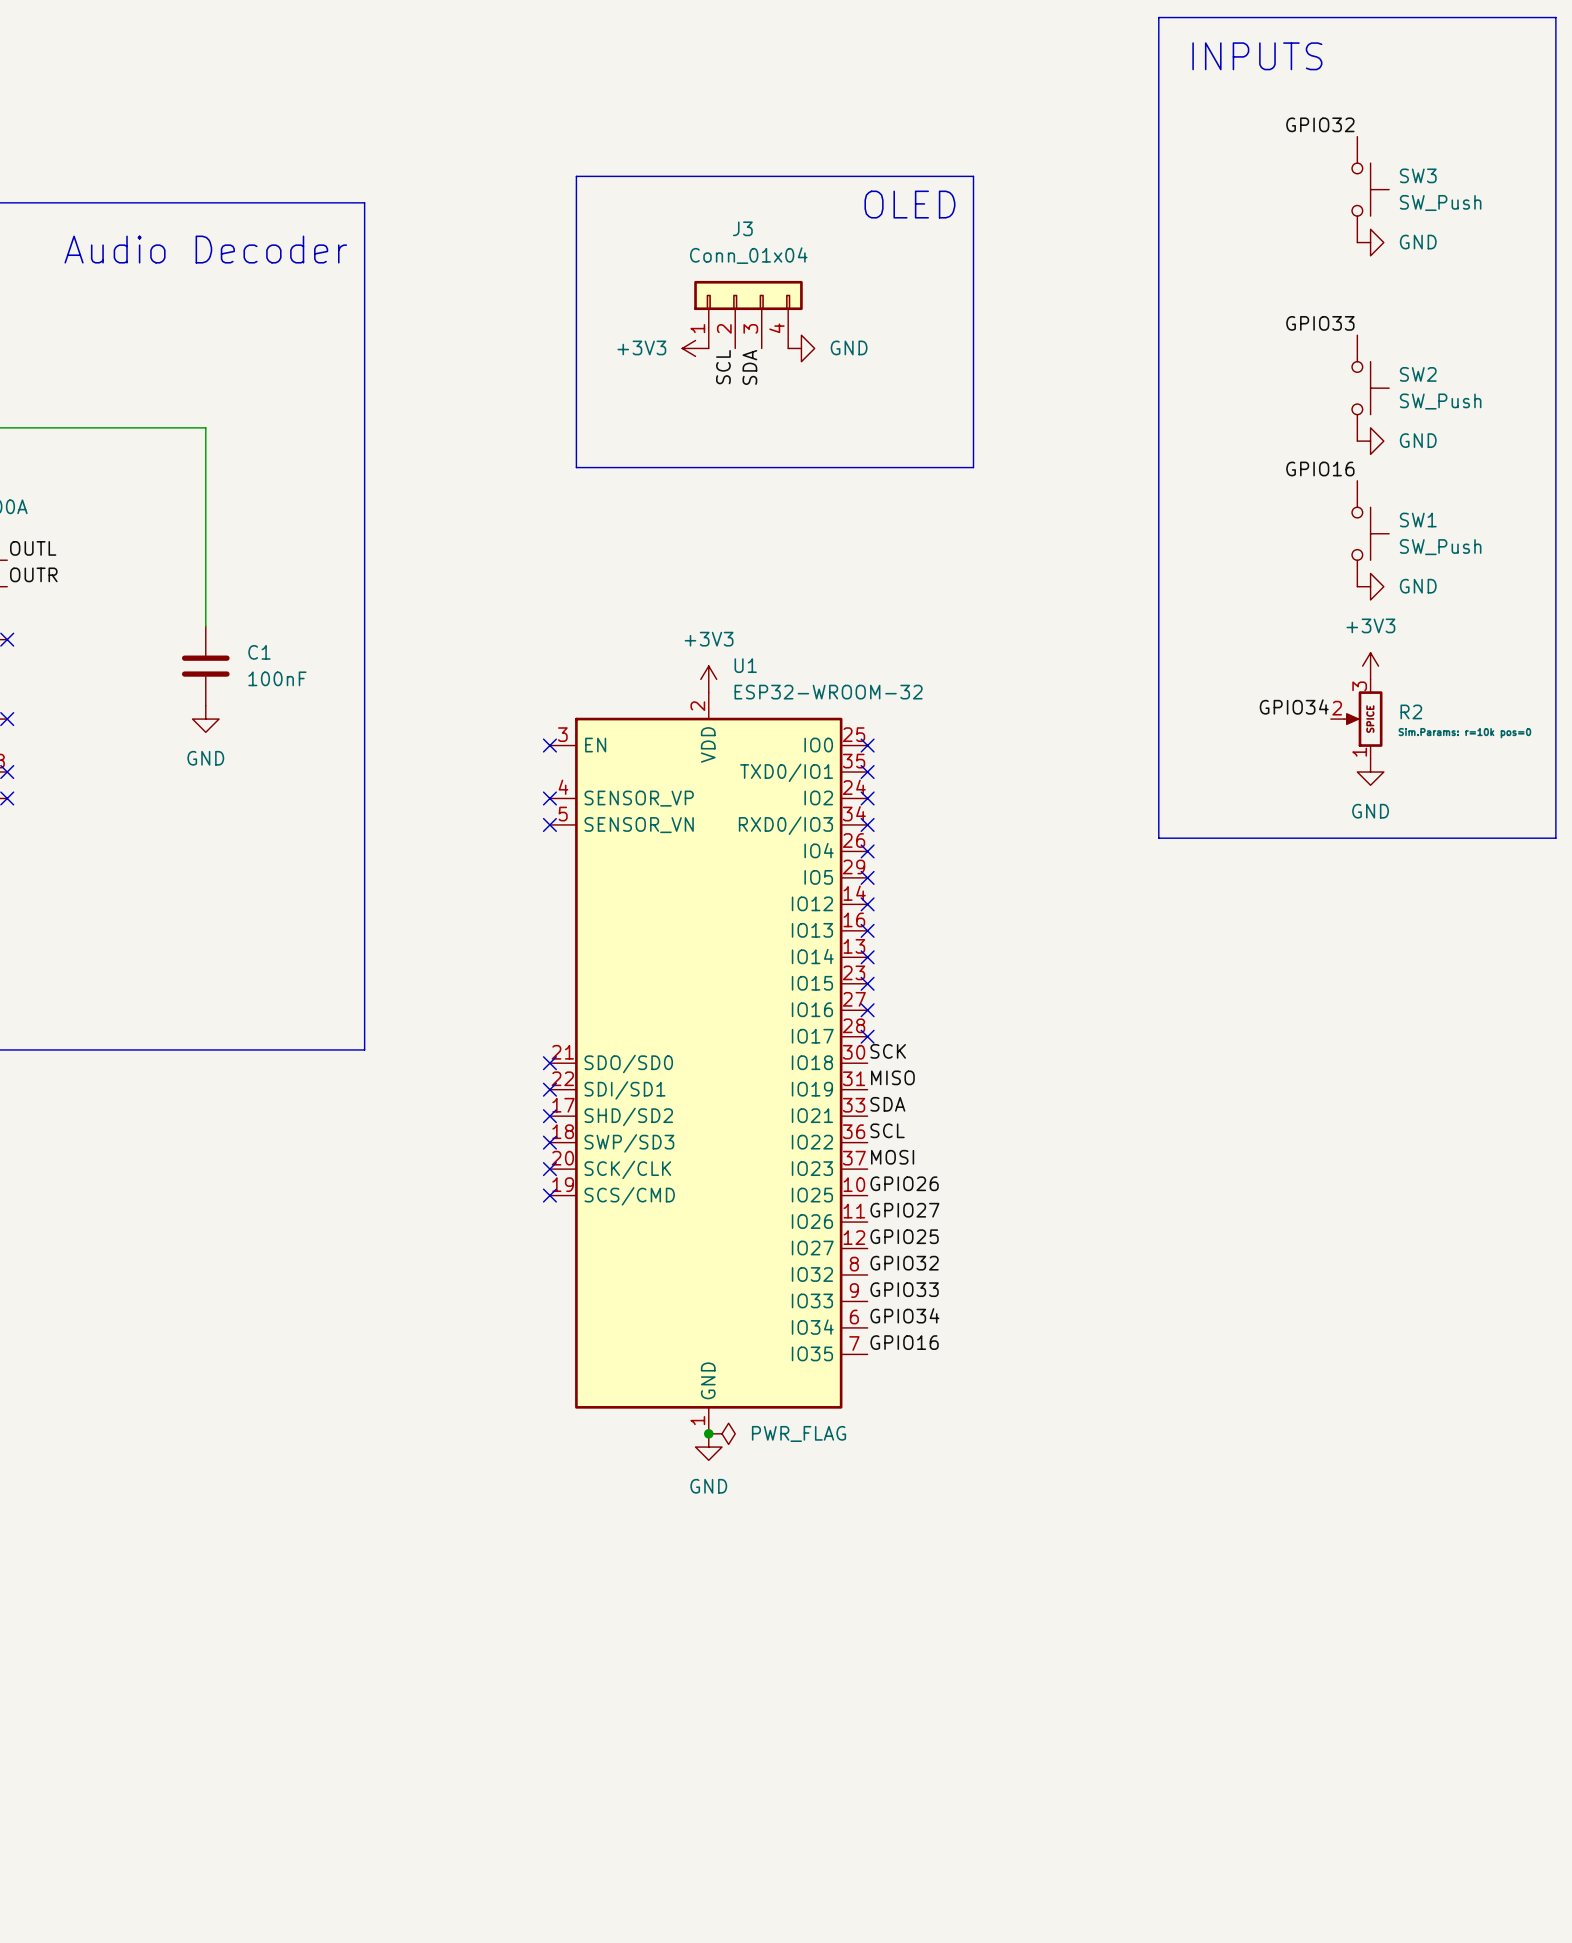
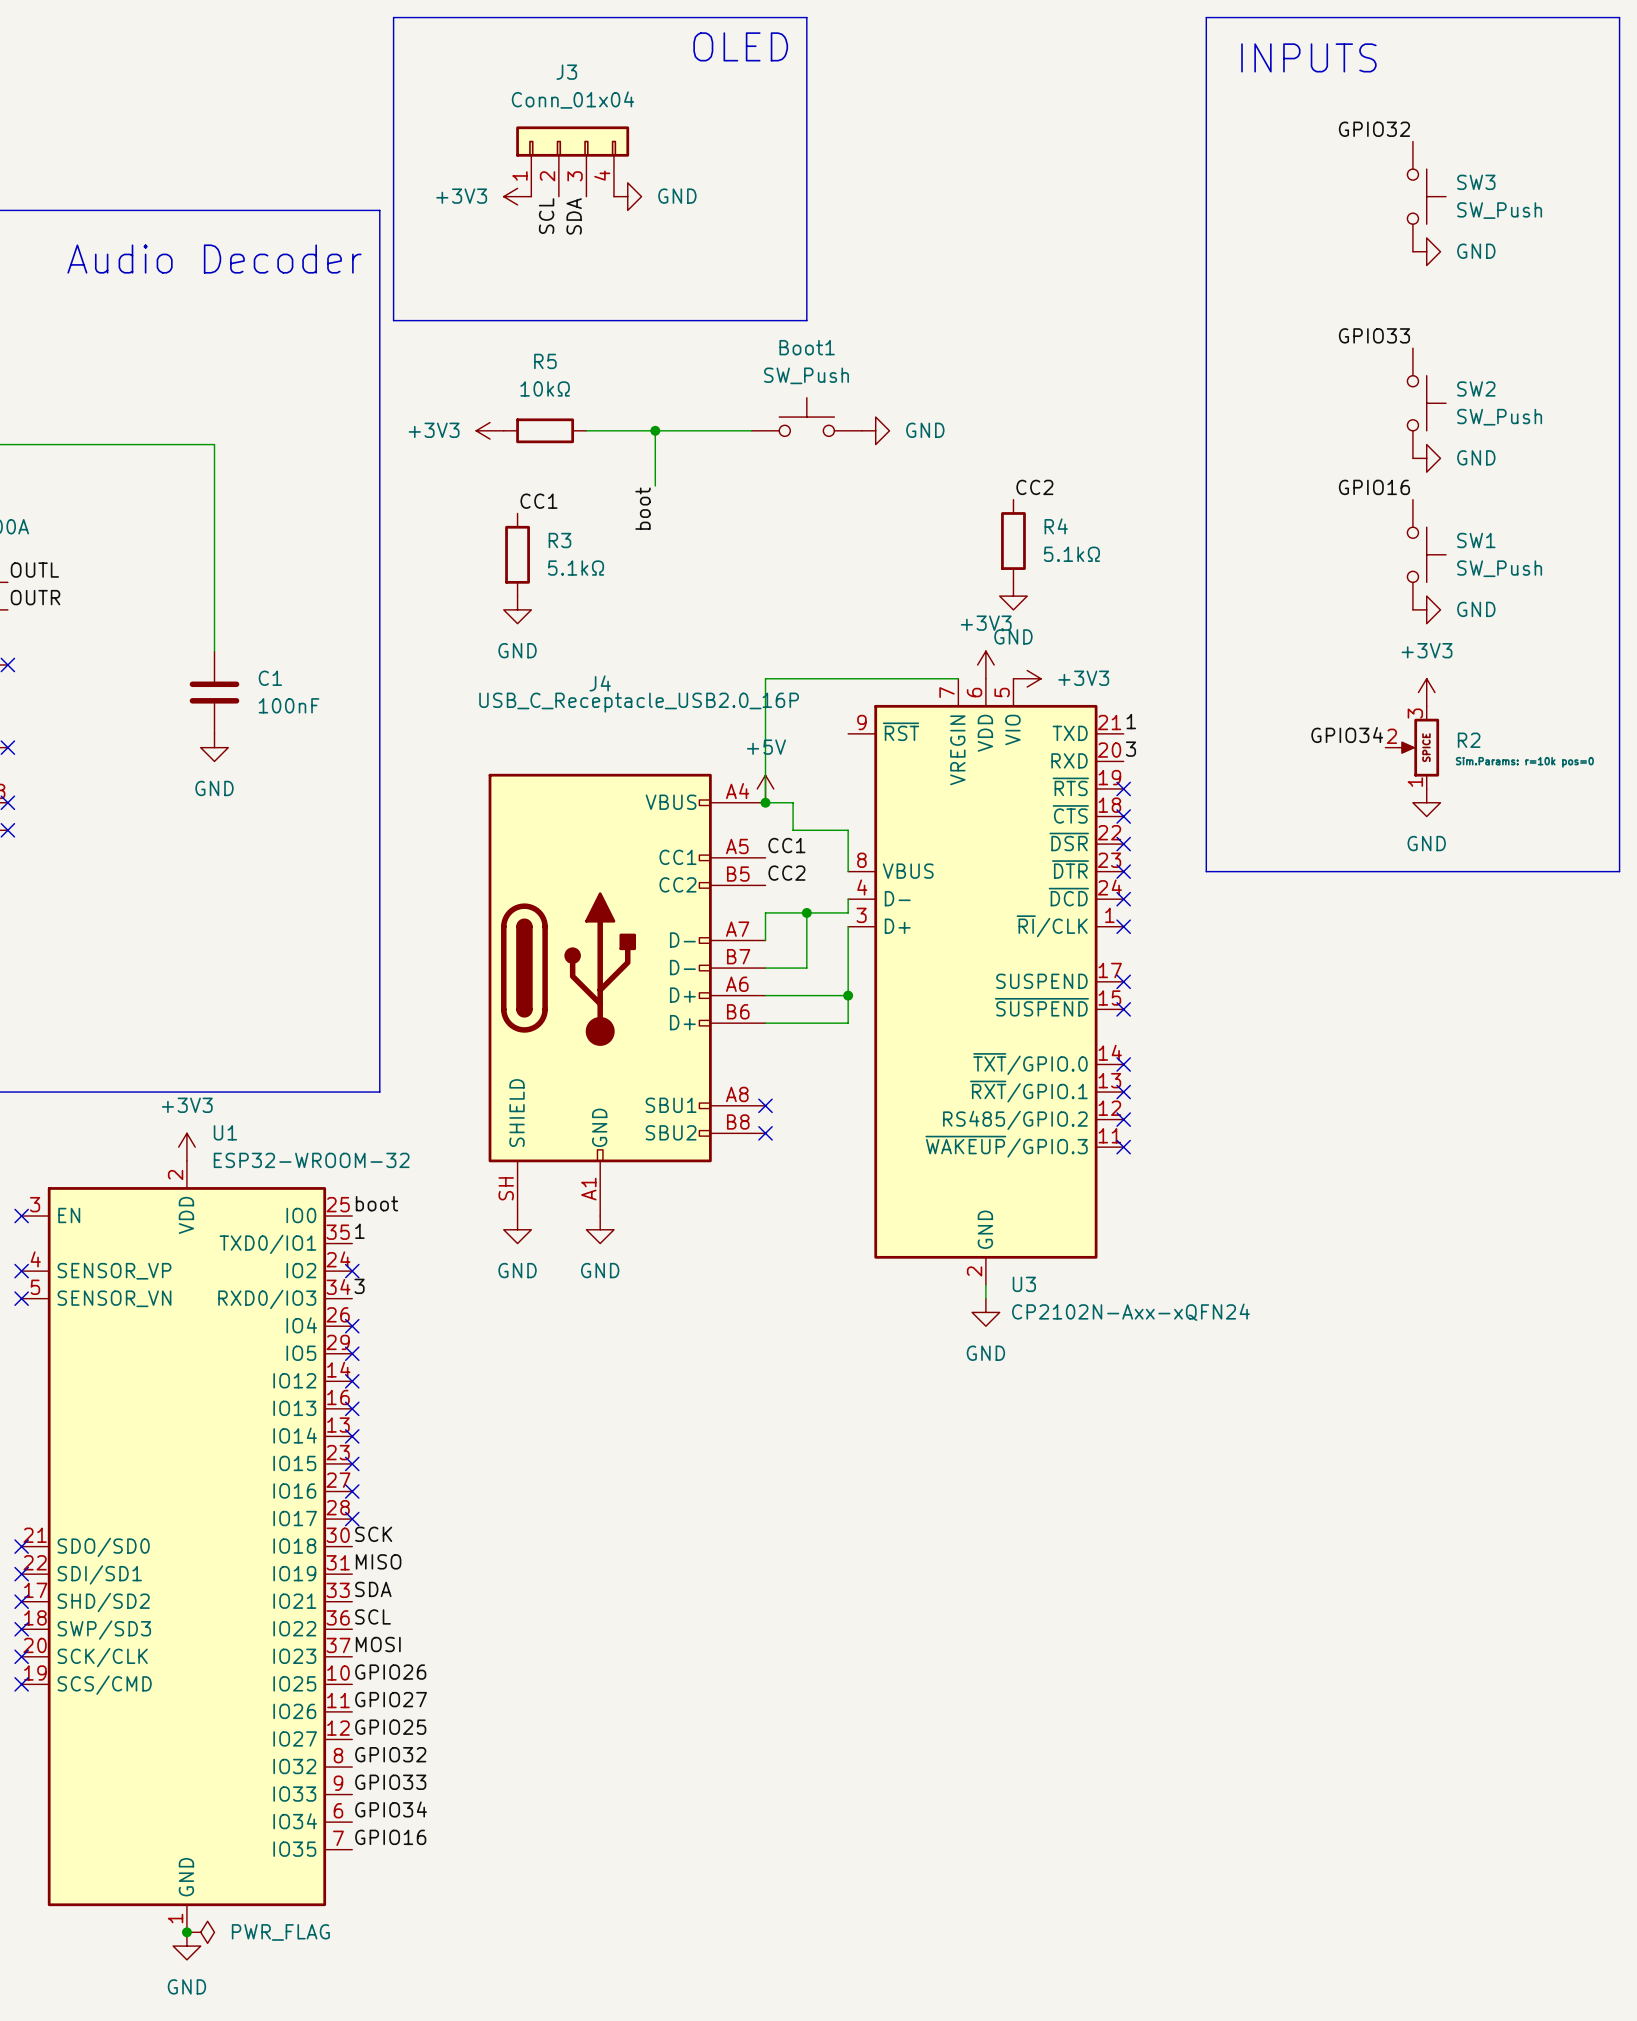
line: (576, 176) (973, 176) (973, 467) (576, 467) (576, 176) -> (393, 17) (806, 17) (806, 320) (393, 320) (393, 17)
power symbol: none -> +3V3 (517, 196)
power symbol: none -> GND (627, 196)
text position: OLED (909, 204) -> OLED (740, 46)
J3 position: (748, 314) -> (572, 161)
power symbol: +3V3 (695, 348) -> none
power symbol position: GND (801, 348) -> GND (875, 430)
label position: SCL (723, 367) -> SCL (546, 216)
label position: SDA (749, 367) -> SDA (574, 216)
Boot1: none -> SW_Push (806, 417)
power symbol: none -> +3V3 (490, 430)
R5: none -> 10kΩ (545, 430)
wire: none -> (586, 430) (751, 430)
wire: none -> (655, 430) (655, 485)
junction: none -> (655, 430)
label: none -> CC2 (1034, 487)
label: none -> CC1 (538, 501)
label: none -> boot (643, 508)
R4: none -> 5.1kΩ (1013, 541)
R3: none -> 5.1kΩ (517, 554)
power symbol: none -> GND (1013, 596)
power symbol: none -> GND (517, 609)
power symbol: none -> +3V3 (985, 665)
wire: none -> (958, 678) (765, 678) (765, 802) (793, 802) (793, 830) (848, 830) (848, 871)
power symbol: none -> +3V3 (1027, 678)
power symbol: +3V3 (708, 679) -> none
label: none -> 1 (1131, 721)
label: none -> 3 (1130, 749)
no-connect mark: (549, 745) -> none
no-connect mark: (867, 745) -> none
power symbol: none -> +5V (765, 788)
no-connect mark: none -> (1123, 788)
junction: none -> (765, 802)
no-connect mark: (867, 772) -> none
no-connect mark: none -> (1123, 816)
no-connect mark: (549, 798) -> none
no-connect mark: (867, 798) -> none
no-connect mark: none -> (1123, 844)
label: none -> CC1 (786, 845)
no-connect mark: (549, 824) -> none
no-connect mark: (867, 824) -> none
no-connect mark: none -> (1123, 871)
label: none -> CC2 (786, 873)
no-connect mark: (867, 851) -> none
no-connect mark: none -> (1123, 899)
junction: none -> (806, 912)
no-connect mark: (867, 877) -> none
no-connect mark: none -> (1123, 926)
no-connect mark: (867, 904) -> none
no-connect mark: (867, 930) -> none
U3: none -> CP2102N-Axx-xQFN24 (985, 981)
no-connect mark: none -> (1123, 981)
J4: none -> USB_C_Receptacle_USB2.0_16P (627, 994)
junction: none -> (848, 995)
no-connect mark: (867, 957) -> none
no-connect mark: none -> (1123, 1009)
no-connect mark: (867, 983) -> none
no-connect mark: (867, 1010) -> none
no-connect mark: none -> (1123, 1064)
no-connect mark: (867, 1036) -> none
no-connect mark: none -> (1123, 1092)
label: SCK (888, 1051) -> none
no-connect mark: (549, 1063) -> none
U1 position: (708, 1063) -> (186, 1546)
no-connect mark: none -> (765, 1105)
no-connect mark: none -> (1123, 1119)
label: MISO (892, 1077) -> none
no-connect mark: (549, 1089) -> none
no-connect mark: none -> (765, 1133)
power symbol: none -> +3V3 (186, 1147)
no-connect mark: none -> (1123, 1147)
label: SDA (887, 1104) -> none
no-connect mark: (549, 1116) -> none
label: SCL (887, 1130) -> none
no-connect mark: (549, 1142) -> none
label: none -> boot (376, 1203)
label: MOSI (892, 1157) -> none
no-connect mark: none -> (21, 1216)
no-connect mark: (549, 1169) -> none
power symbol: none -> GND (517, 1229)
power symbol: none -> GND (600, 1229)
label: none -> 1 (359, 1231)
label: GPIO26 (904, 1183) -> none
no-connect mark: (549, 1195) -> none
label: GPIO27 (904, 1210) -> none
no-connect mark: none -> (21, 1271)
no-connect mark: none -> (352, 1271)
wire: none -> (985, 1284) (985, 1298)
label: none -> 3 (359, 1286)
label: GPIO25 (904, 1236) -> none
no-connect mark: none -> (21, 1298)
power symbol: none -> GND (985, 1312)
label: GPIO32 (904, 1263) -> none
no-connect mark: none -> (352, 1326)
label: GPIO33 (904, 1289) -> none
no-connect mark: none -> (352, 1353)
label: GPIO34 (904, 1315) -> none
no-connect mark: none -> (352, 1381)
label: GPIO16 (904, 1342) -> none
no-connect mark: none -> (352, 1408)
no-connect mark: none -> (352, 1436)
no-connect mark: none -> (352, 1463)
no-connect mark: none -> (352, 1491)
junction: (708, 1433) -> none
power symbol: PWR_FLAG (722, 1433) -> none
power symbol: GND (708, 1447) -> none
no-connect mark: none -> (352, 1519)
label: none -> SCK (373, 1534)
no-connect mark: none -> (21, 1546)
label: none -> MISO (378, 1561)
no-connect mark: none -> (21, 1574)
label: none -> SDA (373, 1589)
no-connect mark: none -> (21, 1601)
label: none -> SCL (373, 1616)
no-connect mark: none -> (21, 1629)
label: none -> MOSI (378, 1644)
no-connect mark: none -> (21, 1656)
label: none -> GPIO26 (390, 1672)
no-connect mark: none -> (21, 1684)
label: none -> GPIO27 (391, 1699)
label: none -> GPIO25 (390, 1727)
label: none -> GPIO32 (390, 1754)
label: none -> GPIO33 (390, 1782)
label: none -> GPIO34 (391, 1809)
label: none -> GPIO16 (390, 1837)
junction: none -> (186, 1932)
power symbol: none -> PWR_FLAG (200, 1932)
power symbol: none -> GND (186, 1946)

